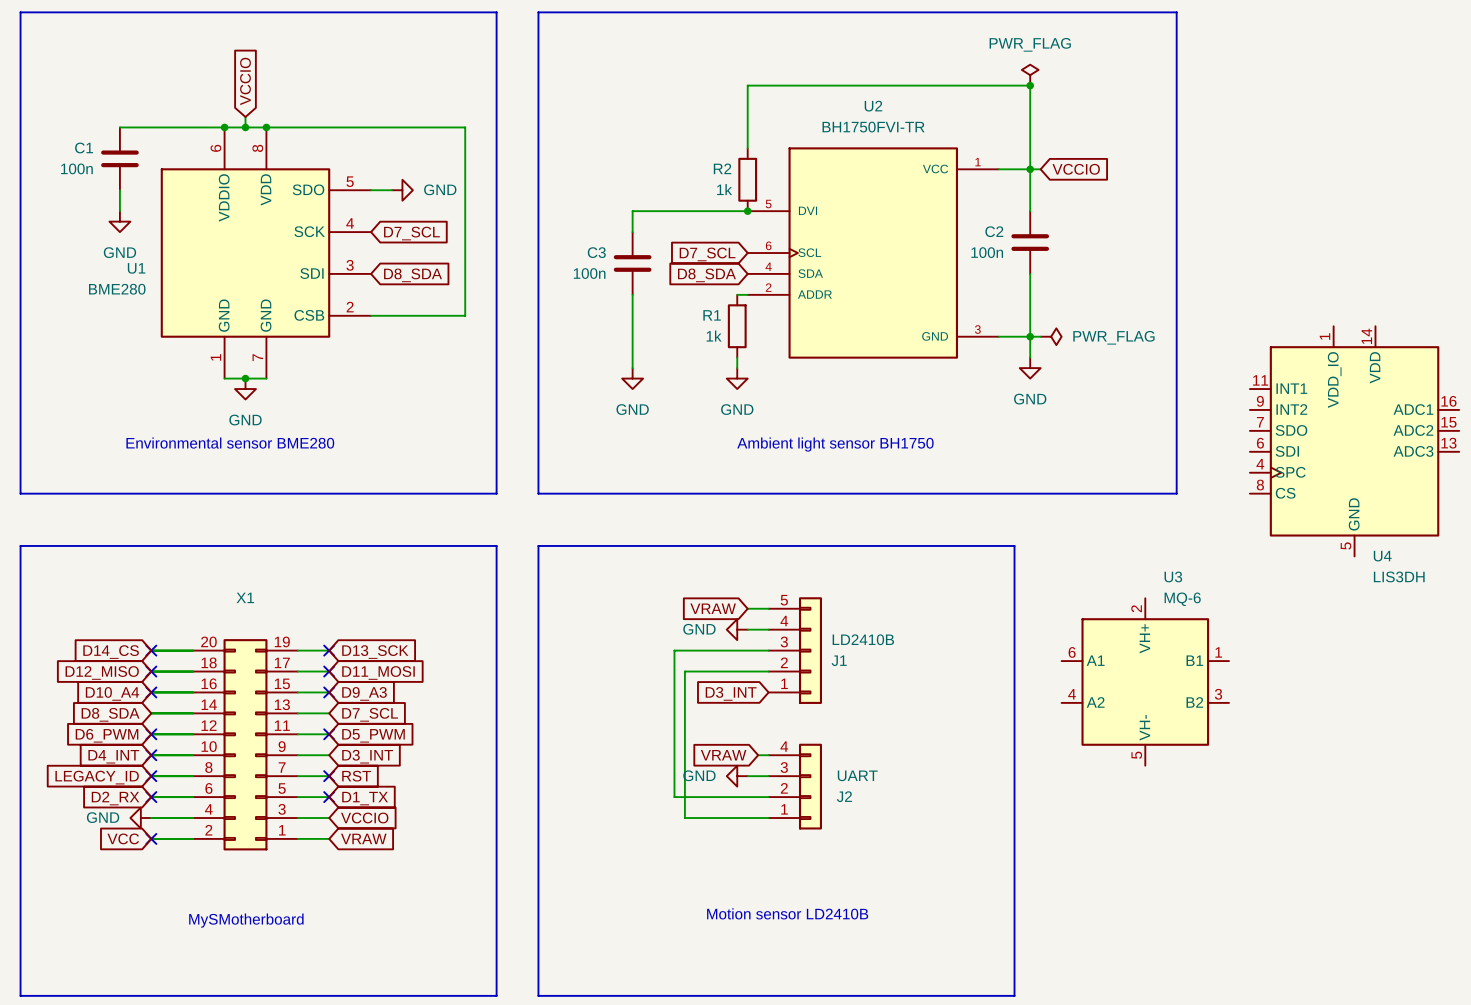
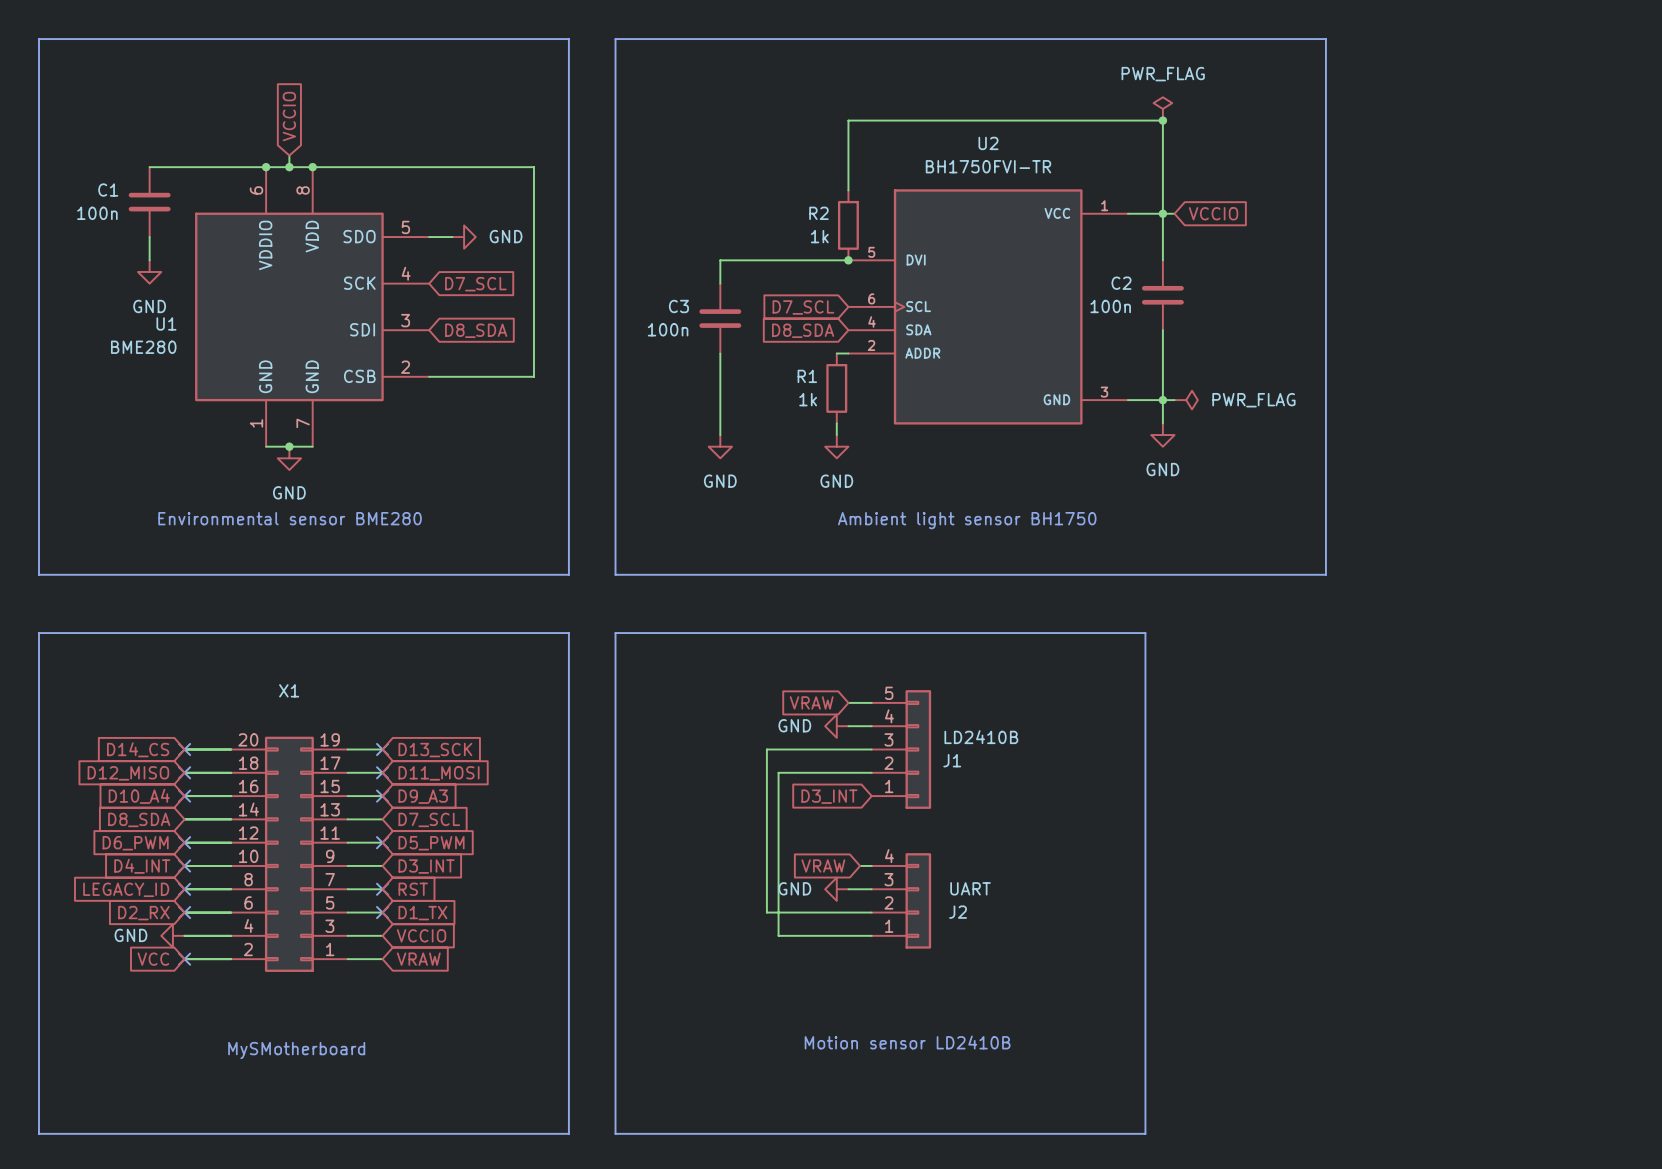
U4: LIS3DH (1354, 441) -> none
U3: MQ-6 (1145, 681) -> none

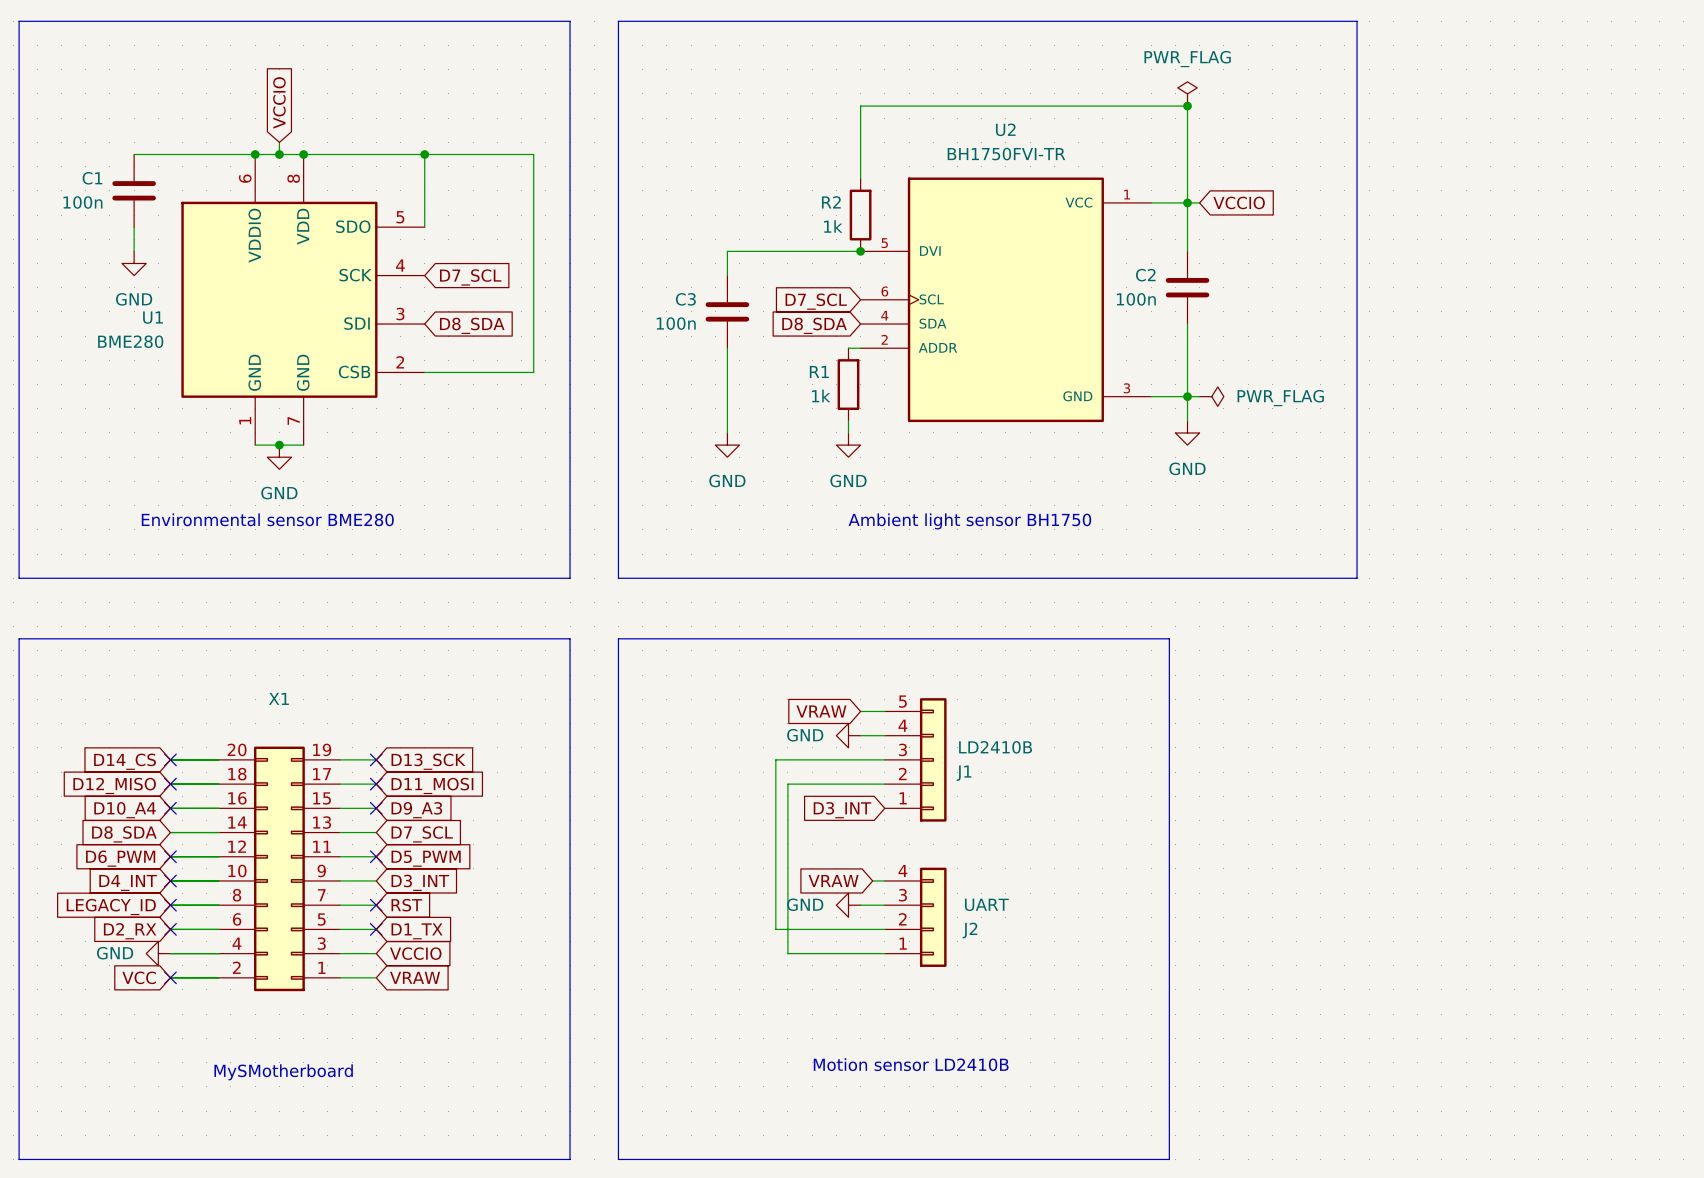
junction: none -> (424, 154)
wire: (429, 237) (452, 237) -> (424, 227) (424, 154)
power symbol: GND (464, 237) -> none

